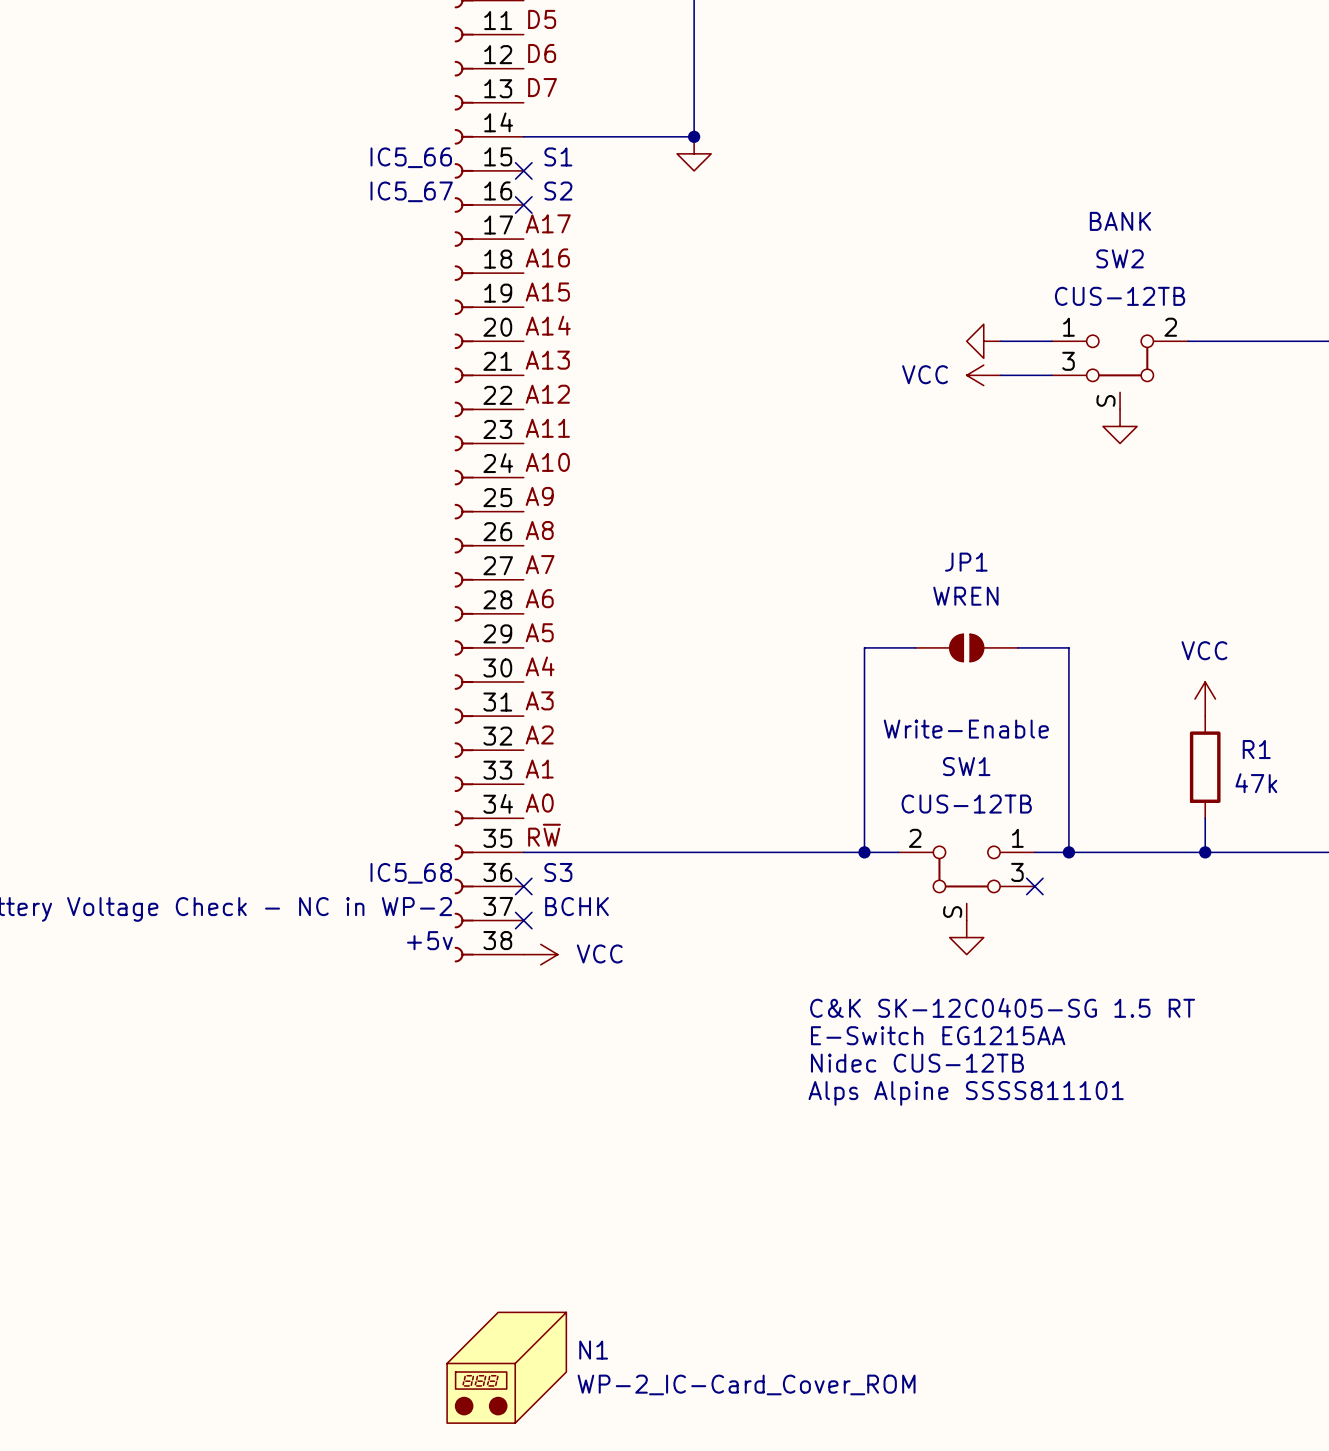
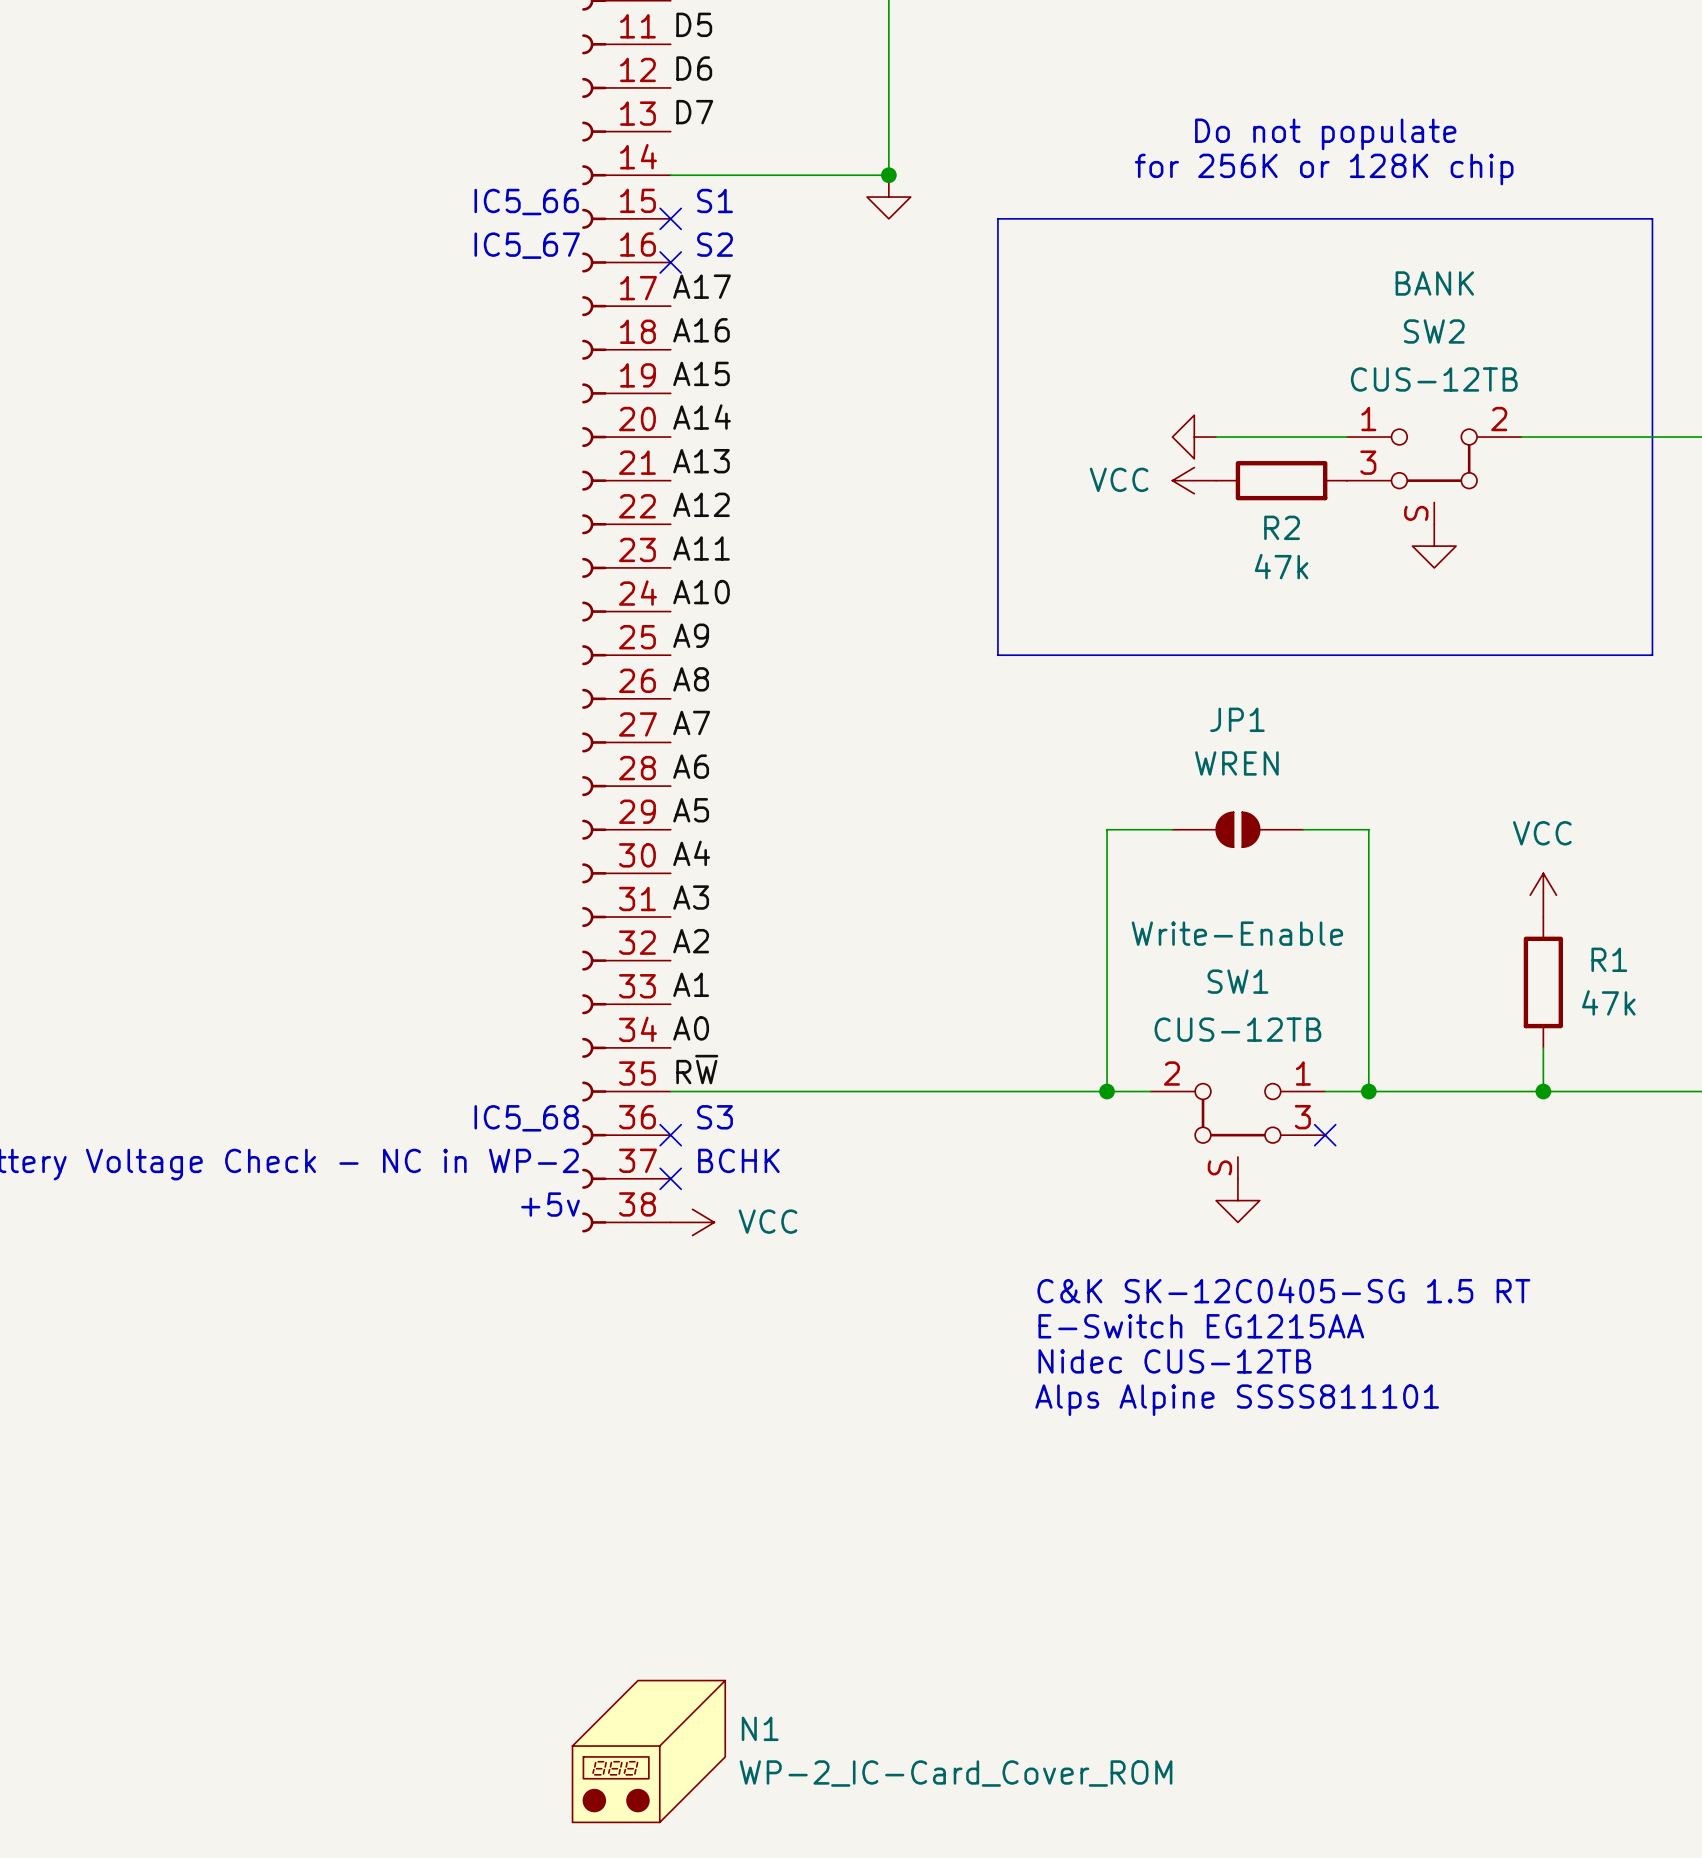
text: none -> Do not populate (1325, 134)
text: none -> for 256K or 128K chip (1324, 169)
line: none -> (997, 218) (1652, 218) (1652, 655) (997, 655) (997, 218)
power symbol position: (983, 341) -> (1194, 437)
power symbol position: VCC (983, 375) -> VCC (1194, 480)
wire: (1000, 375) (1051, 375) -> (1216, 437) (1281, 437)
R2: none -> 47k (1281, 480)

